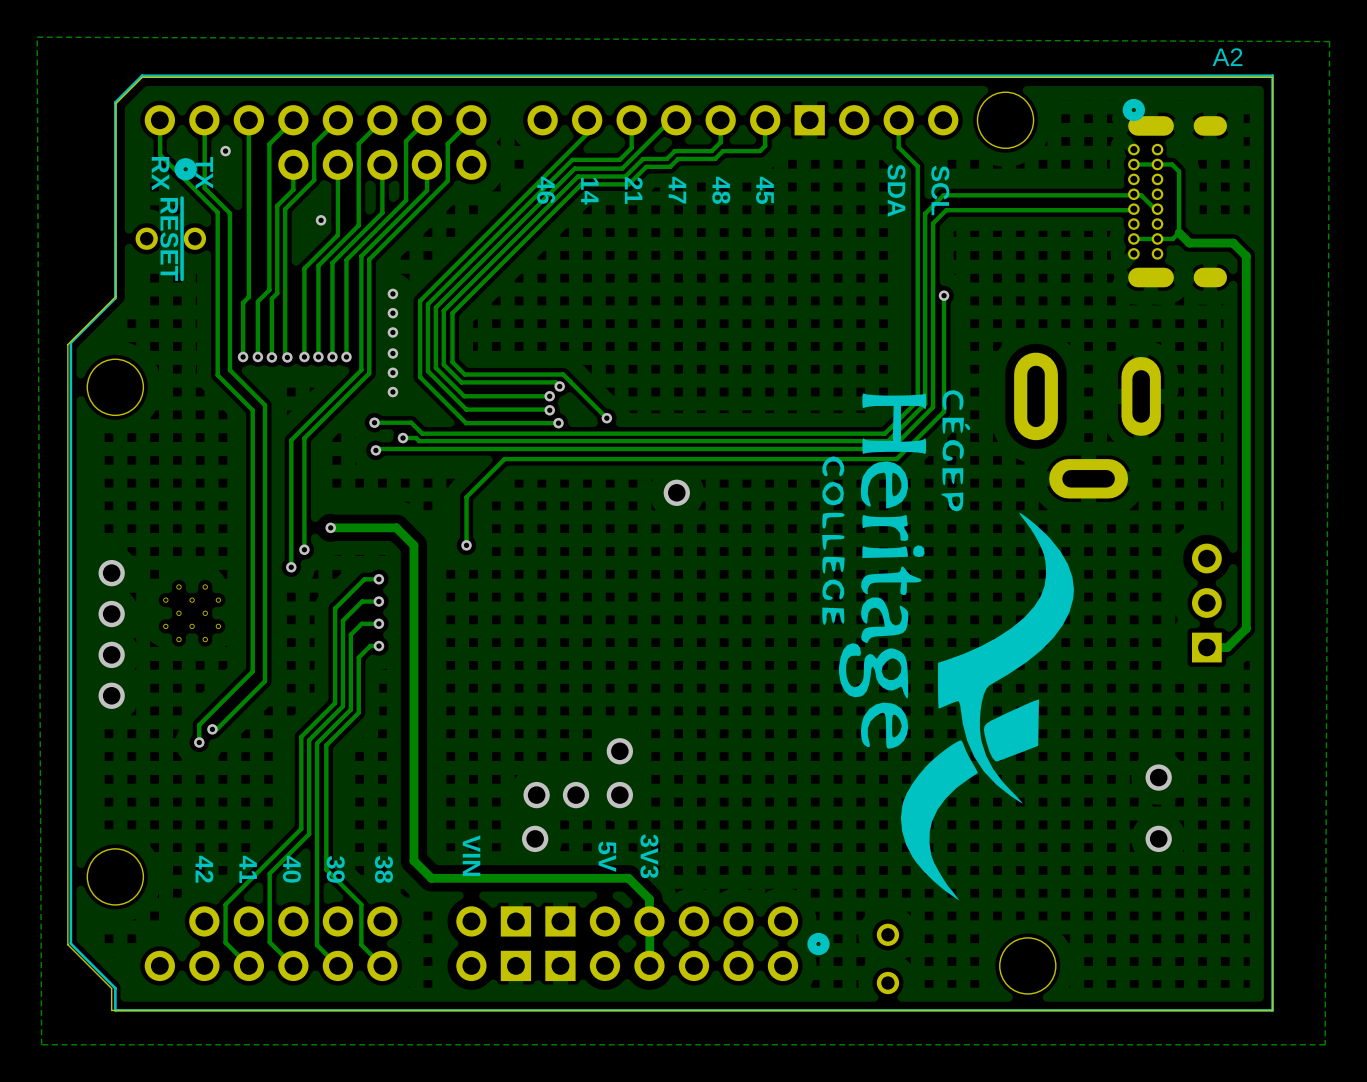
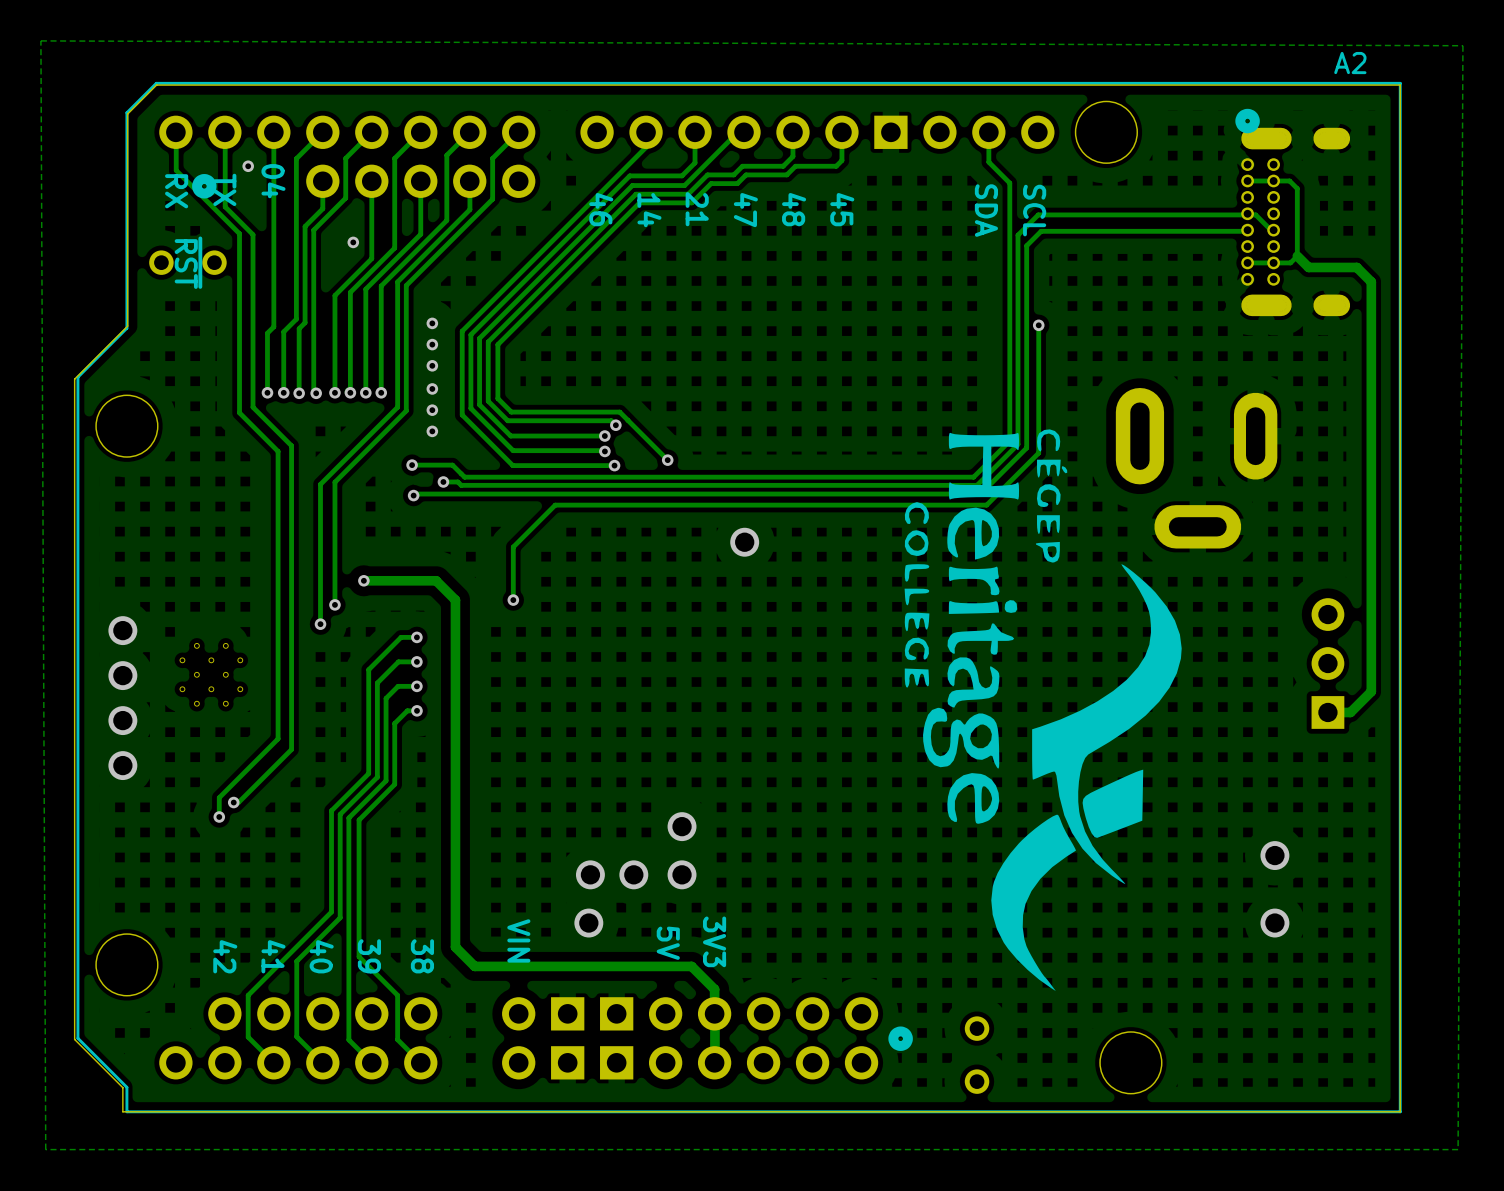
text: none -> 04 (273, 181)
~{RESET} name: ~{RESET} (171, 239) -> ~{RST} (188, 262)

